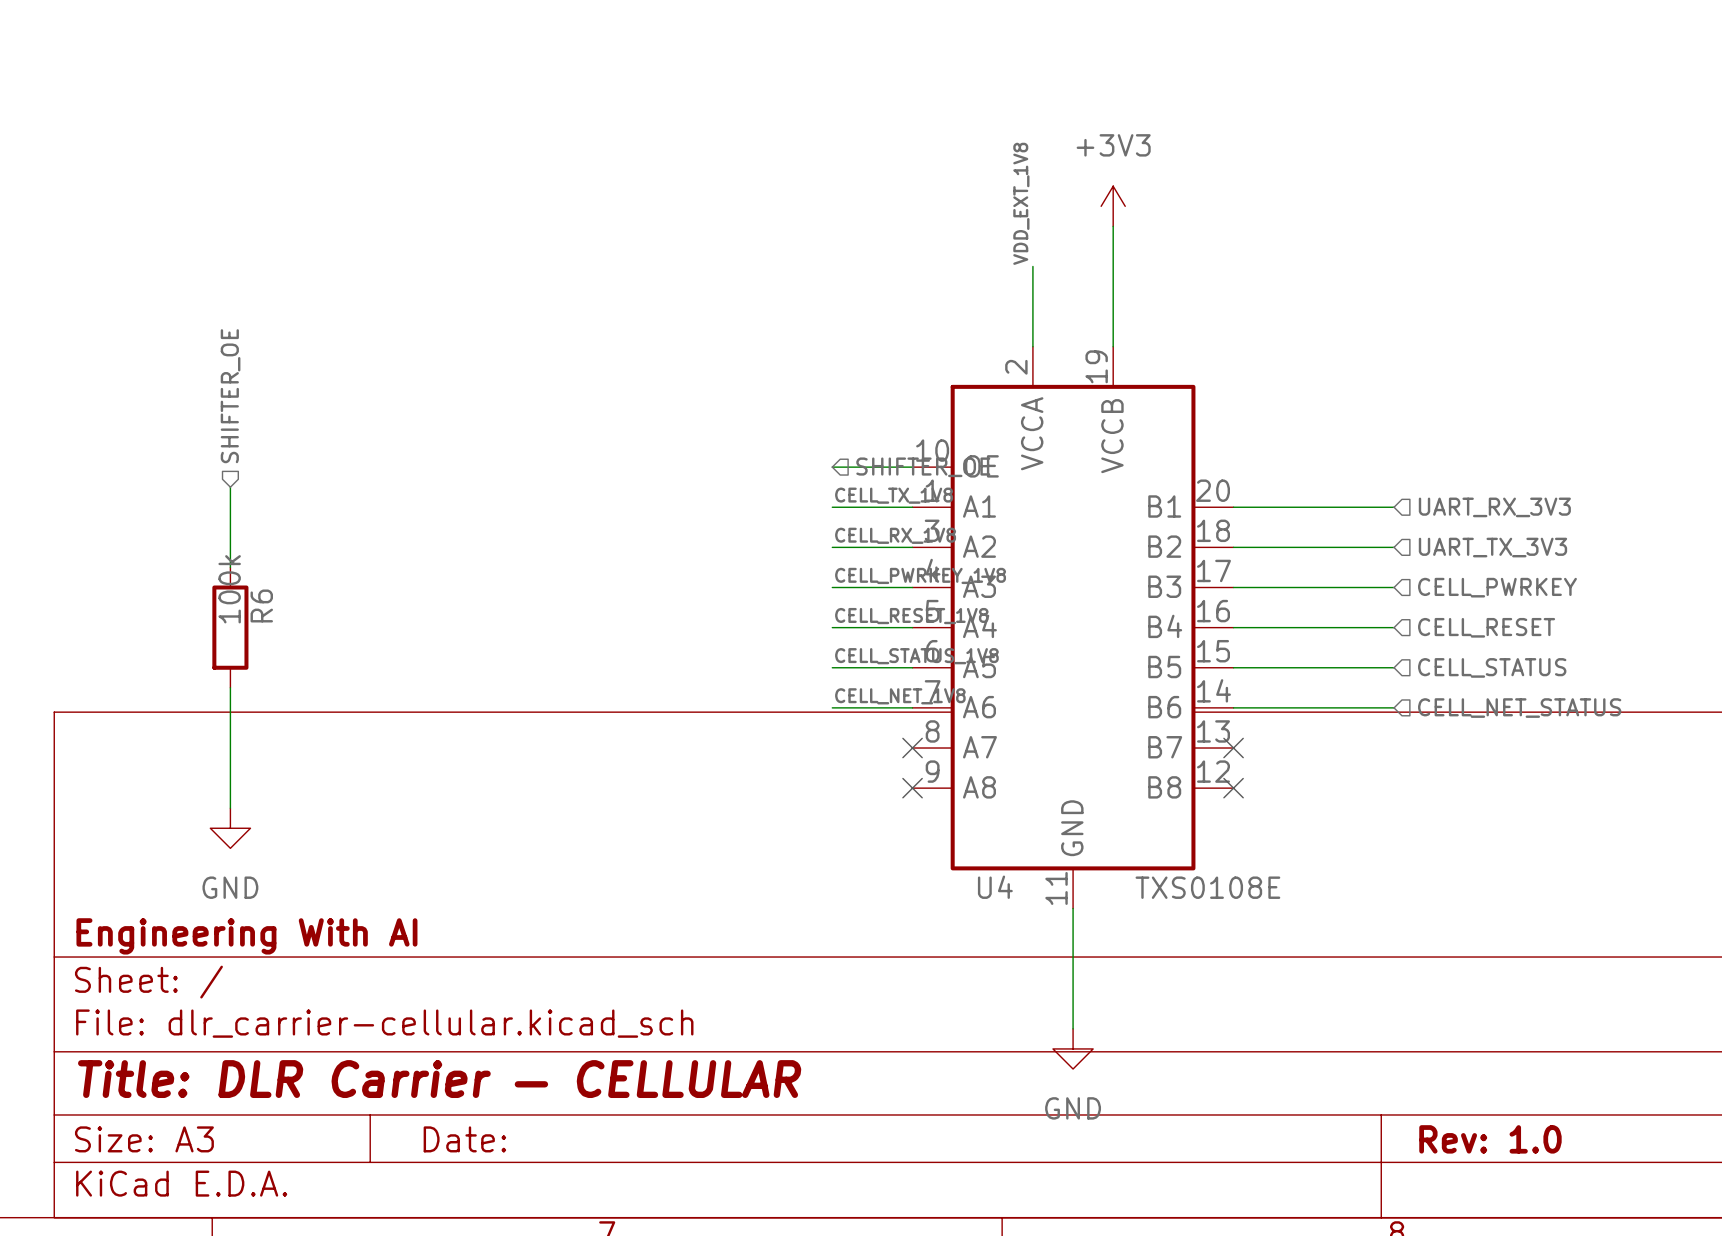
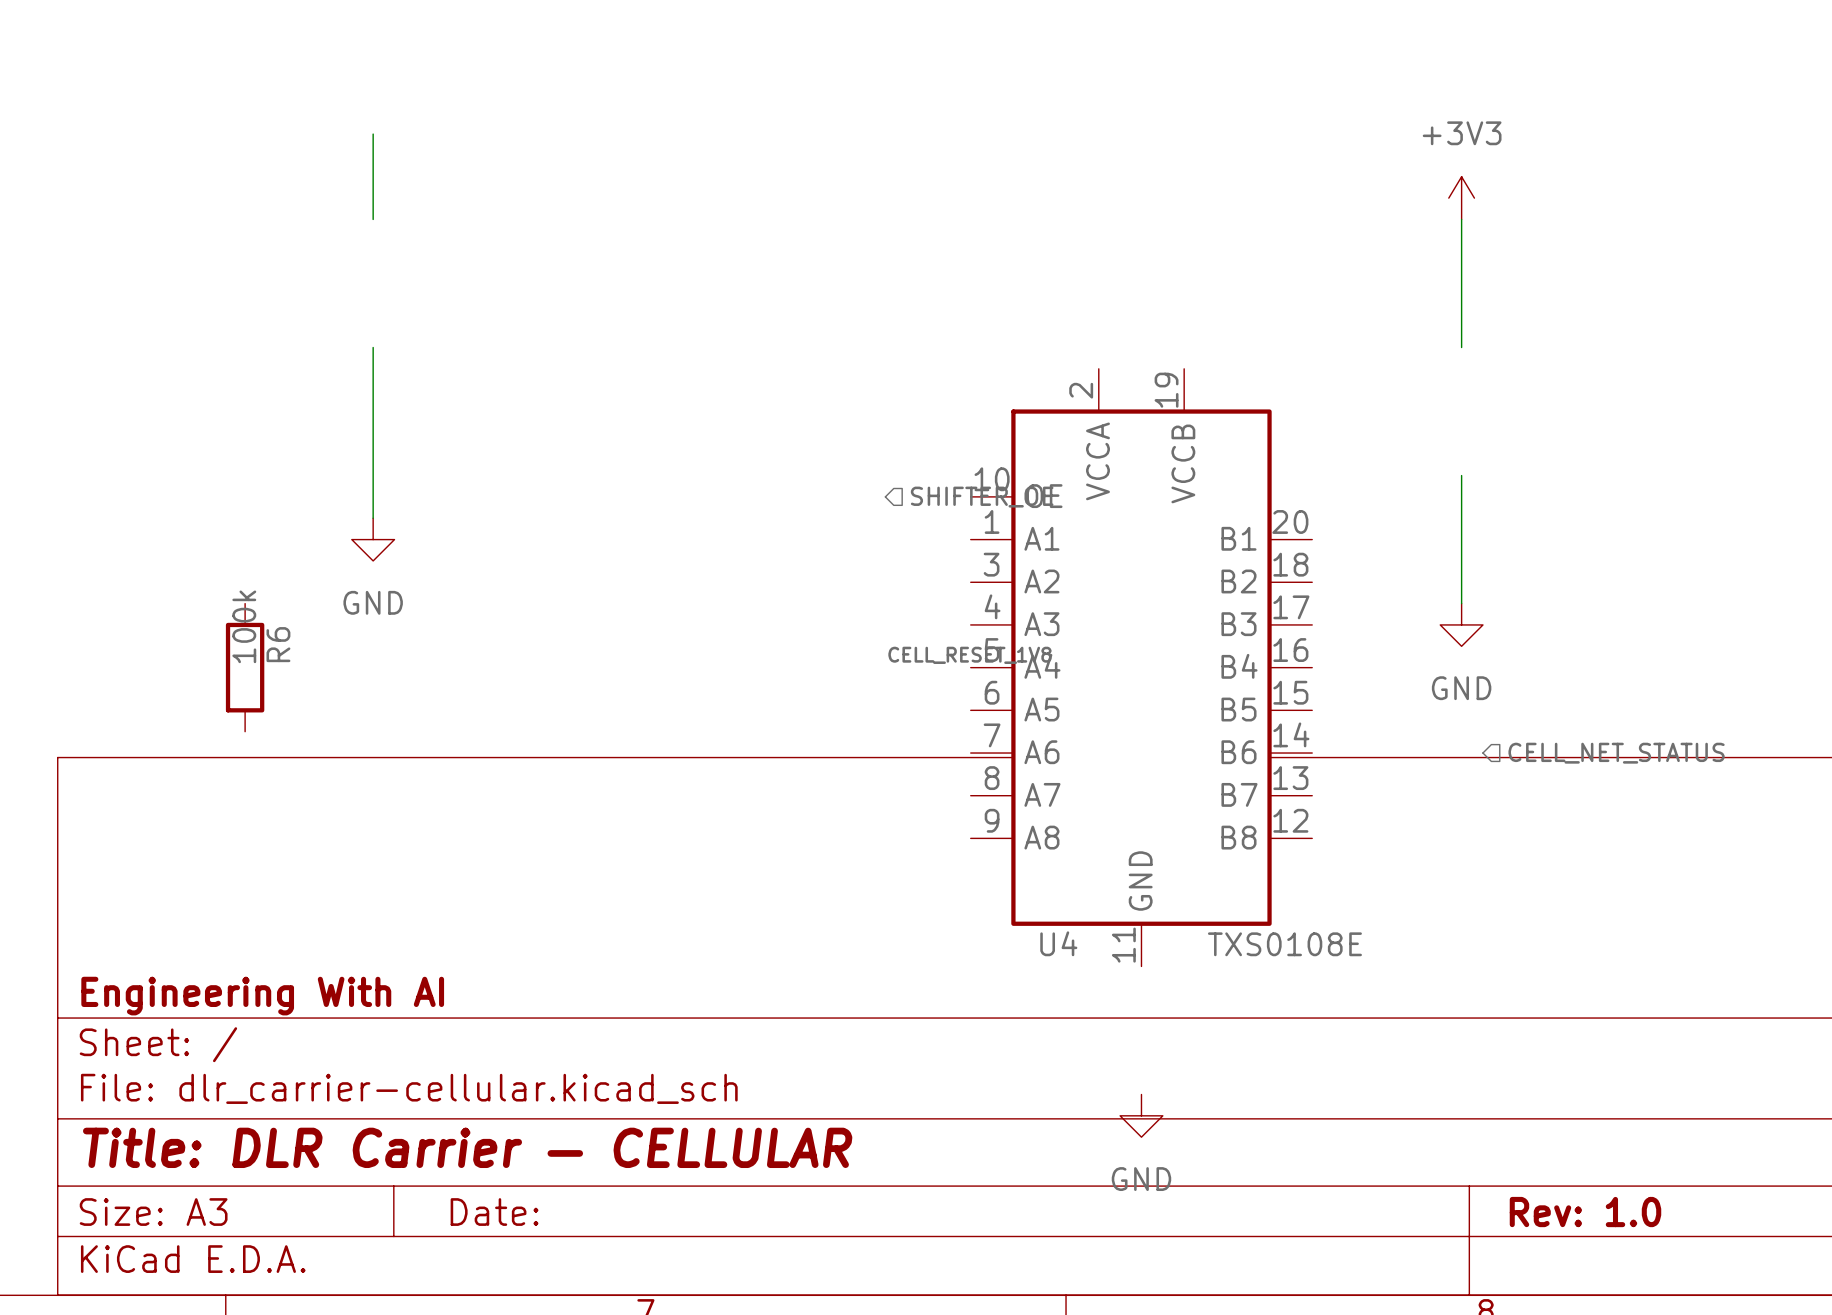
label: VDD_EXT_1V8 (1021, 203) -> none
power symbol position: +3V3 (1113, 206) -> +3V3 (1461, 198)
wire: (1113, 226) (1113, 346) -> (1461, 219) (1461, 347)
wire: (1032, 266) (1032, 346) -> none
wire: none -> (373, 347) (373, 518)
hierarchical label: SHIFTER_OE (230, 396) -> none
wire: none -> (1461, 475) (1461, 603)
wire: (832, 467) (912, 467) -> none
wire: (230, 487) (230, 567) -> (373, 134) (373, 219)
label: CELL_TX_1V8 (894, 495) -> none
power symbol: none -> GND (373, 539)
wire: (832, 507) (912, 507) -> none
wire: (1233, 507) (1394, 507) -> none
hierarchical label: UART_RX_3V3 (1494, 507) -> none
label: CELL_RX_1V8 (895, 535) -> none
wire: (832, 547) (912, 547) -> none
wire: (1233, 547) (1394, 547) -> none
hierarchical label: UART_TX_3V3 (1492, 547) -> none
label: CELL_PWRKEY_1V8 (920, 575) -> none
wire: (832, 587) (912, 587) -> none
wire: (1233, 587) (1394, 587) -> none
power symbol: none -> GND (1461, 624)
hierarchical label: CELL_PWRKEY (1497, 587) -> none
wire: (832, 627) (912, 627) -> none
wire: (1233, 627) (1394, 627) -> none
hierarchical label: CELL_RESET (1486, 627) -> none
label: CELL_STATUS_1V8 (916, 656) -> none
wire: (832, 667) (912, 667) -> none
wire: (1233, 667) (1394, 667) -> none
hierarchical label: CELL_STATUS (1492, 667) -> none
wire: (230, 687) (230, 808) -> none
label: CELL_NET_1V8 (900, 696) -> none
wire: (832, 707) (912, 707) -> none
wire: (1233, 707) (1394, 707) -> none
no-connect mark: (912, 748) -> none
no-connect mark: (1233, 748) -> none
no-connect mark: (912, 788) -> none
no-connect mark: (1233, 788) -> none
power symbol: GND (230, 828) -> none
wire: (1073, 908) (1073, 1028) -> none

